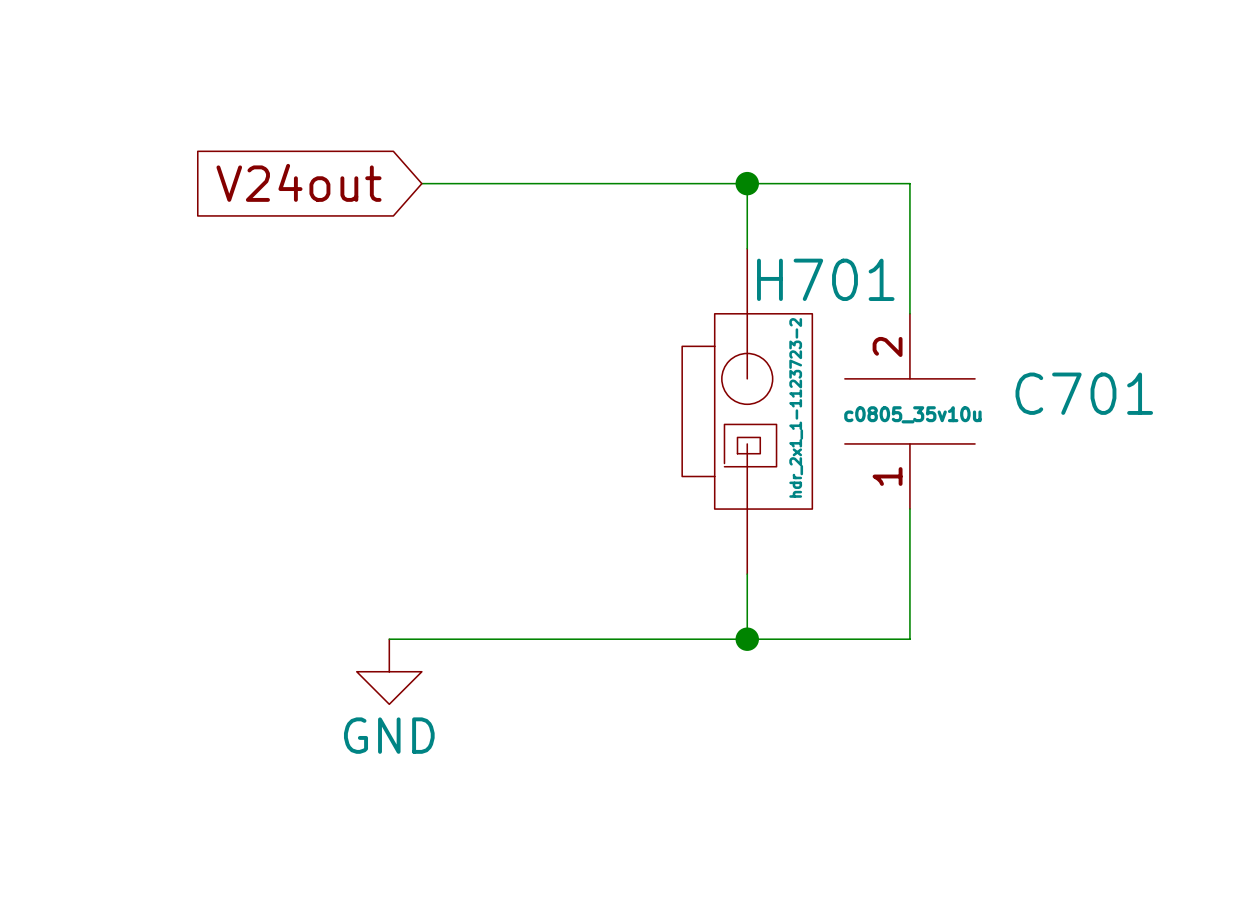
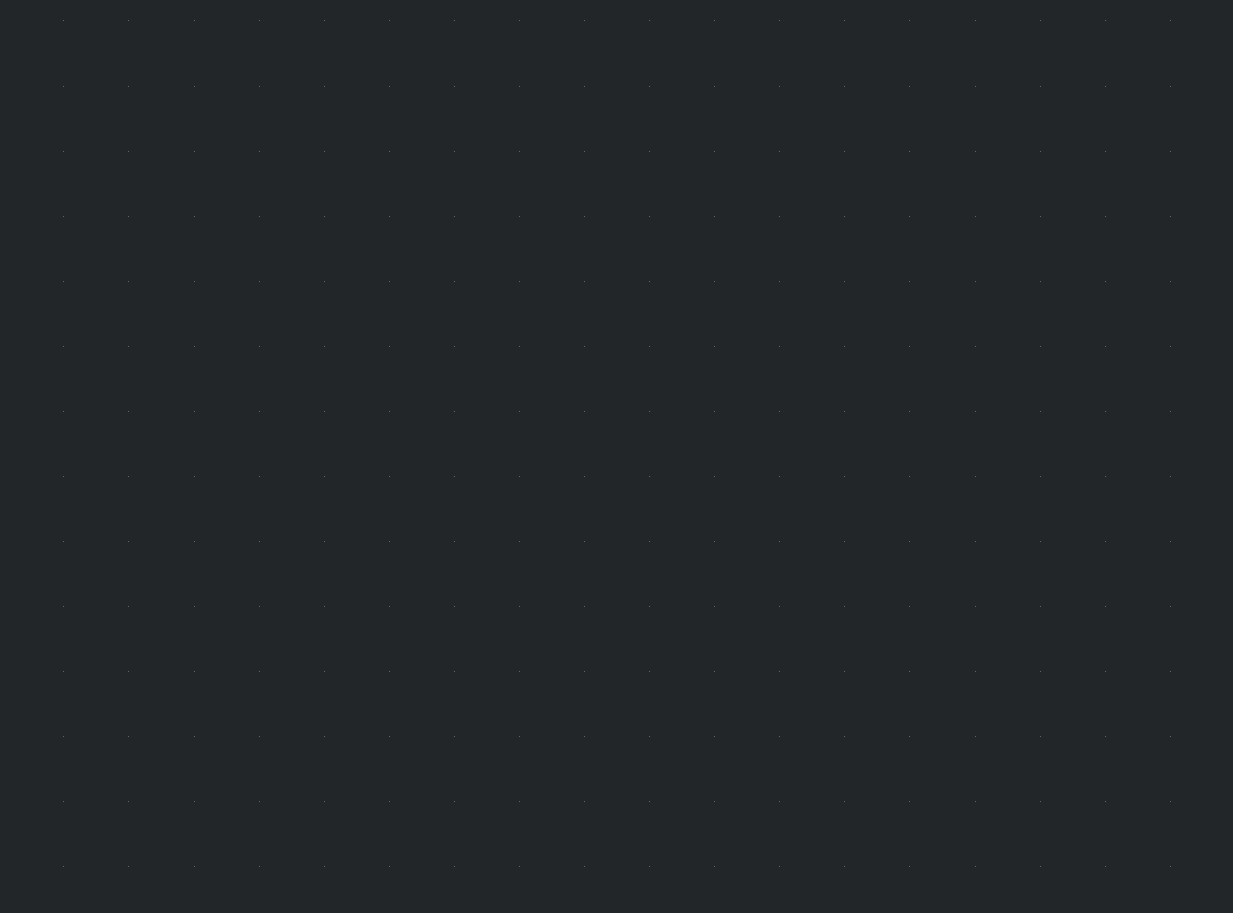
global label: V24out (298, 182) -> none
wire: (421, 183) (909, 183) (909, 313) -> none
wire: (747, 183) (747, 248) -> none
junction: (747, 183) -> none
H701: hdr_2x1_1-1123723-2 (747, 411) -> none
C701: c0805_35v10u (909, 411) -> none
wire: (909, 509) (909, 639) (389, 639) -> none
wire: (747, 574) (747, 639) -> none
junction: (747, 639) -> none
power symbol: GND (389, 671) -> none

